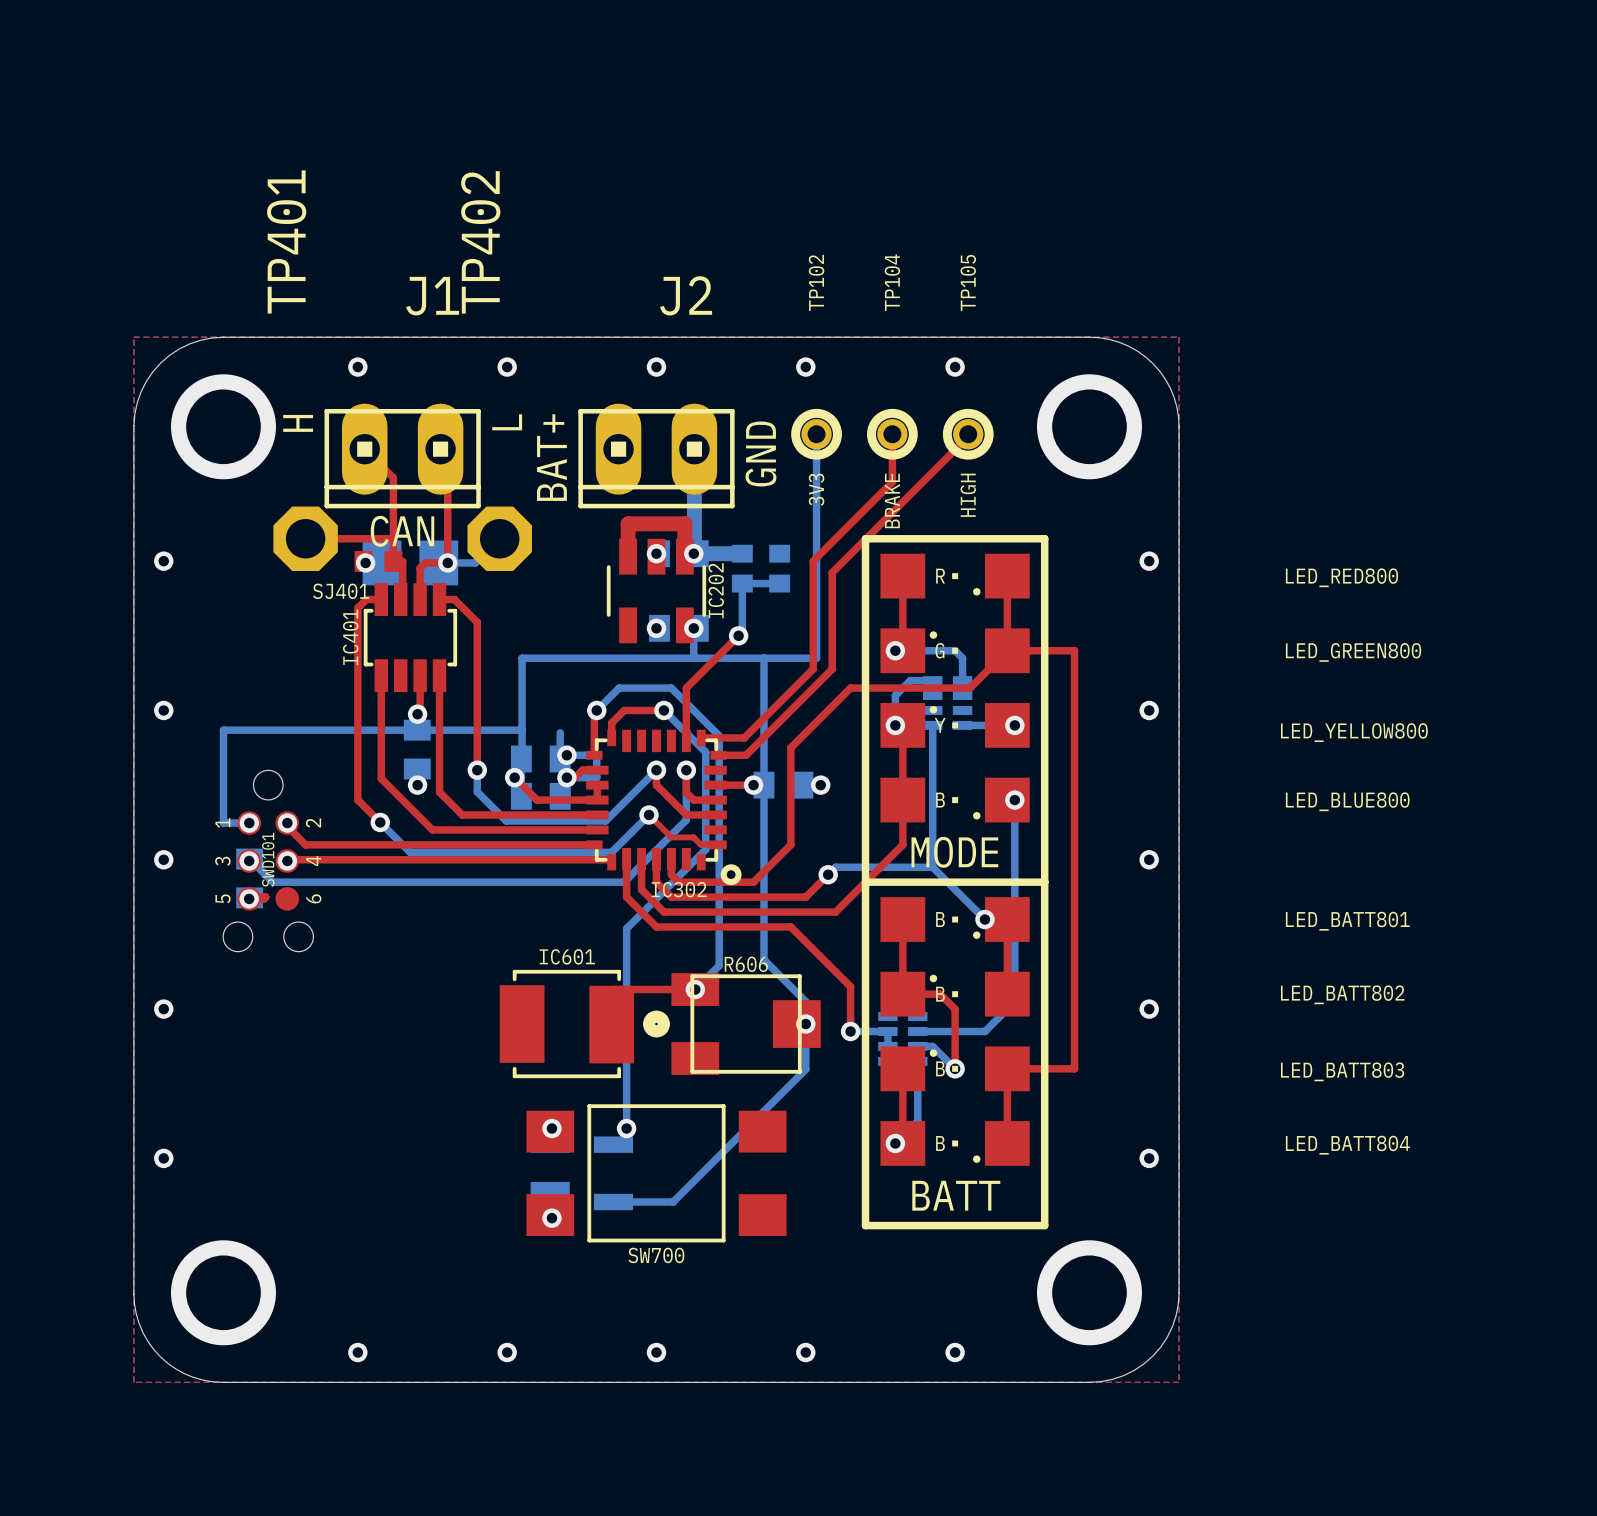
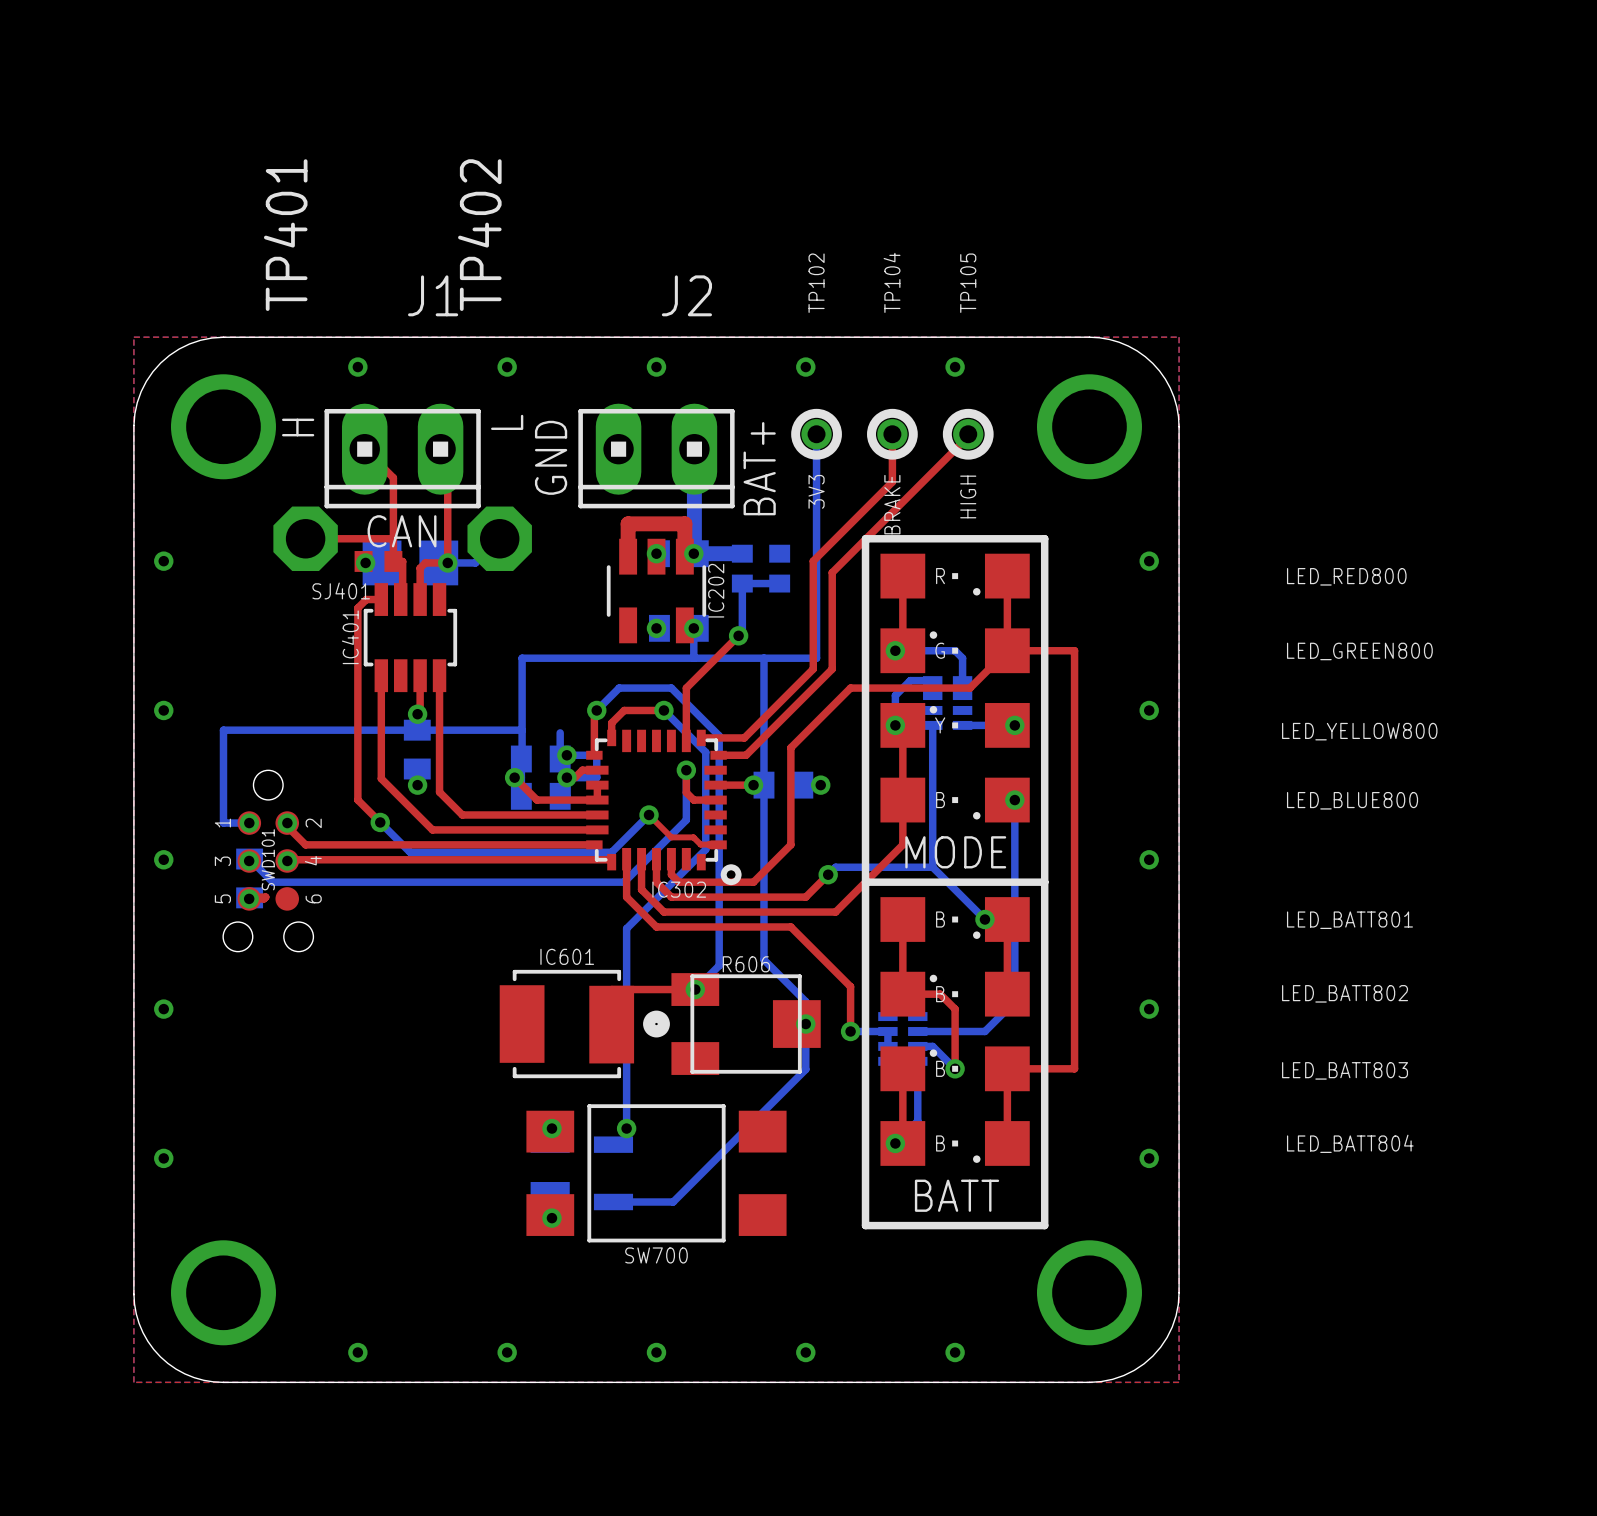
text: GND (761, 453) -> BAT+ (759, 468)
text: BAT+ (551, 457) -> GND (551, 457)
top track: (439, 599) (454, 599) (477, 622) (477, 770) -> none
bottom track: (477, 770) (477, 792) (506, 820) (605, 820) (656, 770) -> none
via: (477, 770) -> none
top track: (656, 770) (656, 785) (686, 814) (715, 814) -> none
via: (656, 770) -> none

